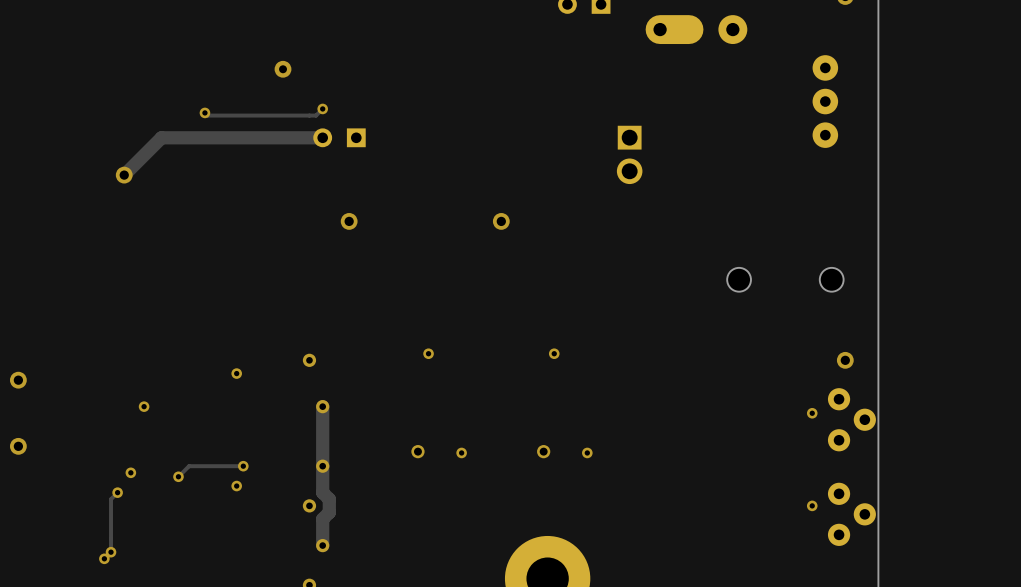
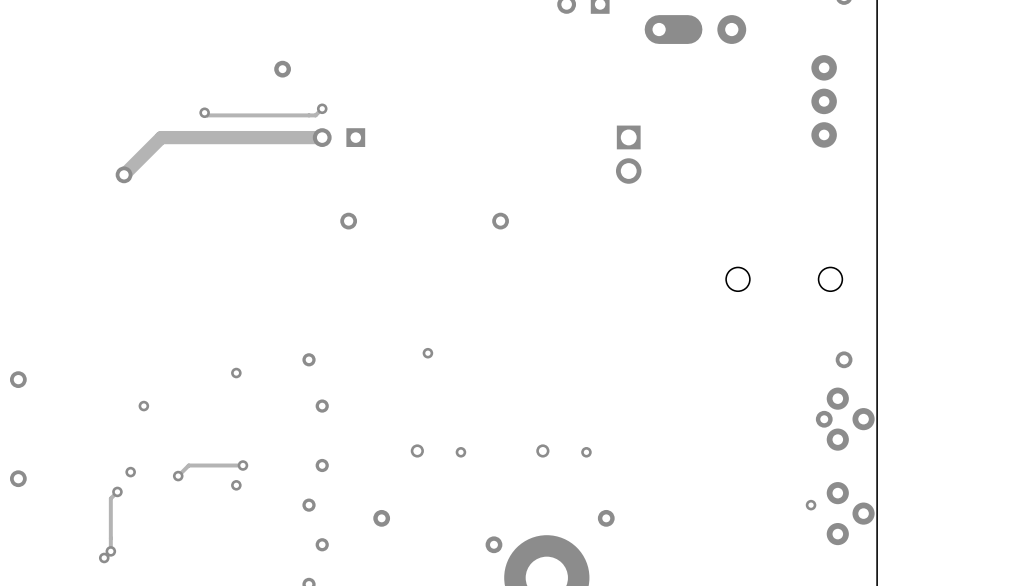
via: (554, 353) -> none
track: (322, 406) (322, 492) (329, 499) (329, 512) (322, 519) (322, 545) -> none
via: (812, 413) -> none
via: none -> (824, 419)
via position: (18, 446) -> (18, 478)
via: none -> (381, 518)
via: none -> (606, 518)
via: none -> (493, 544)

